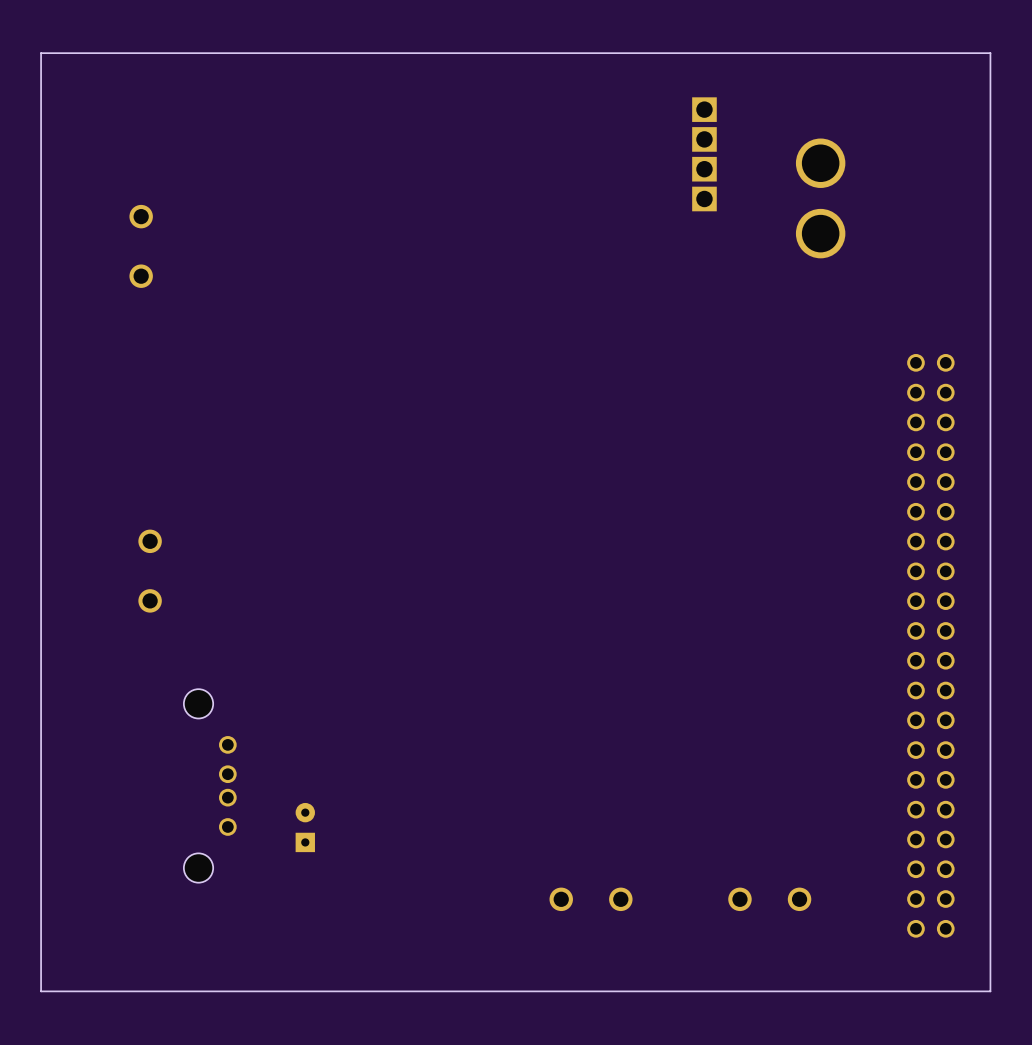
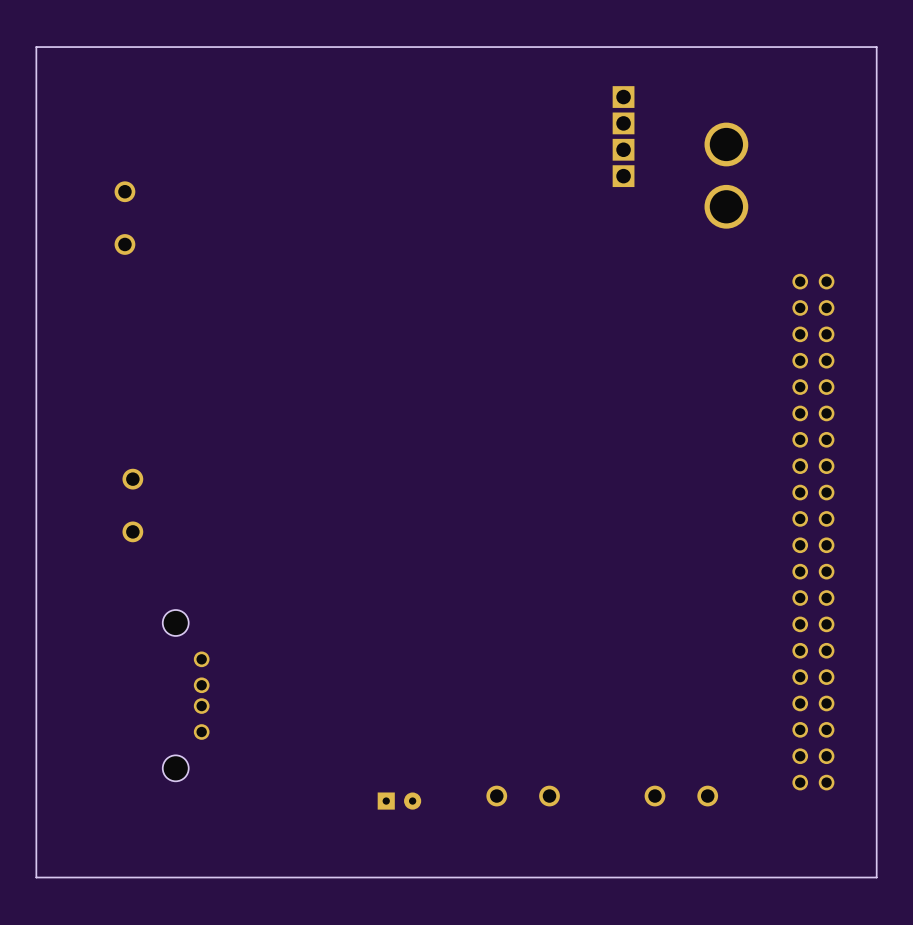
part position: (930, 645) -> (813, 532)
part rotation: 0° (305, 827) -> 90° clockwise (399, 801)
part position: (305, 827) -> (399, 801)

